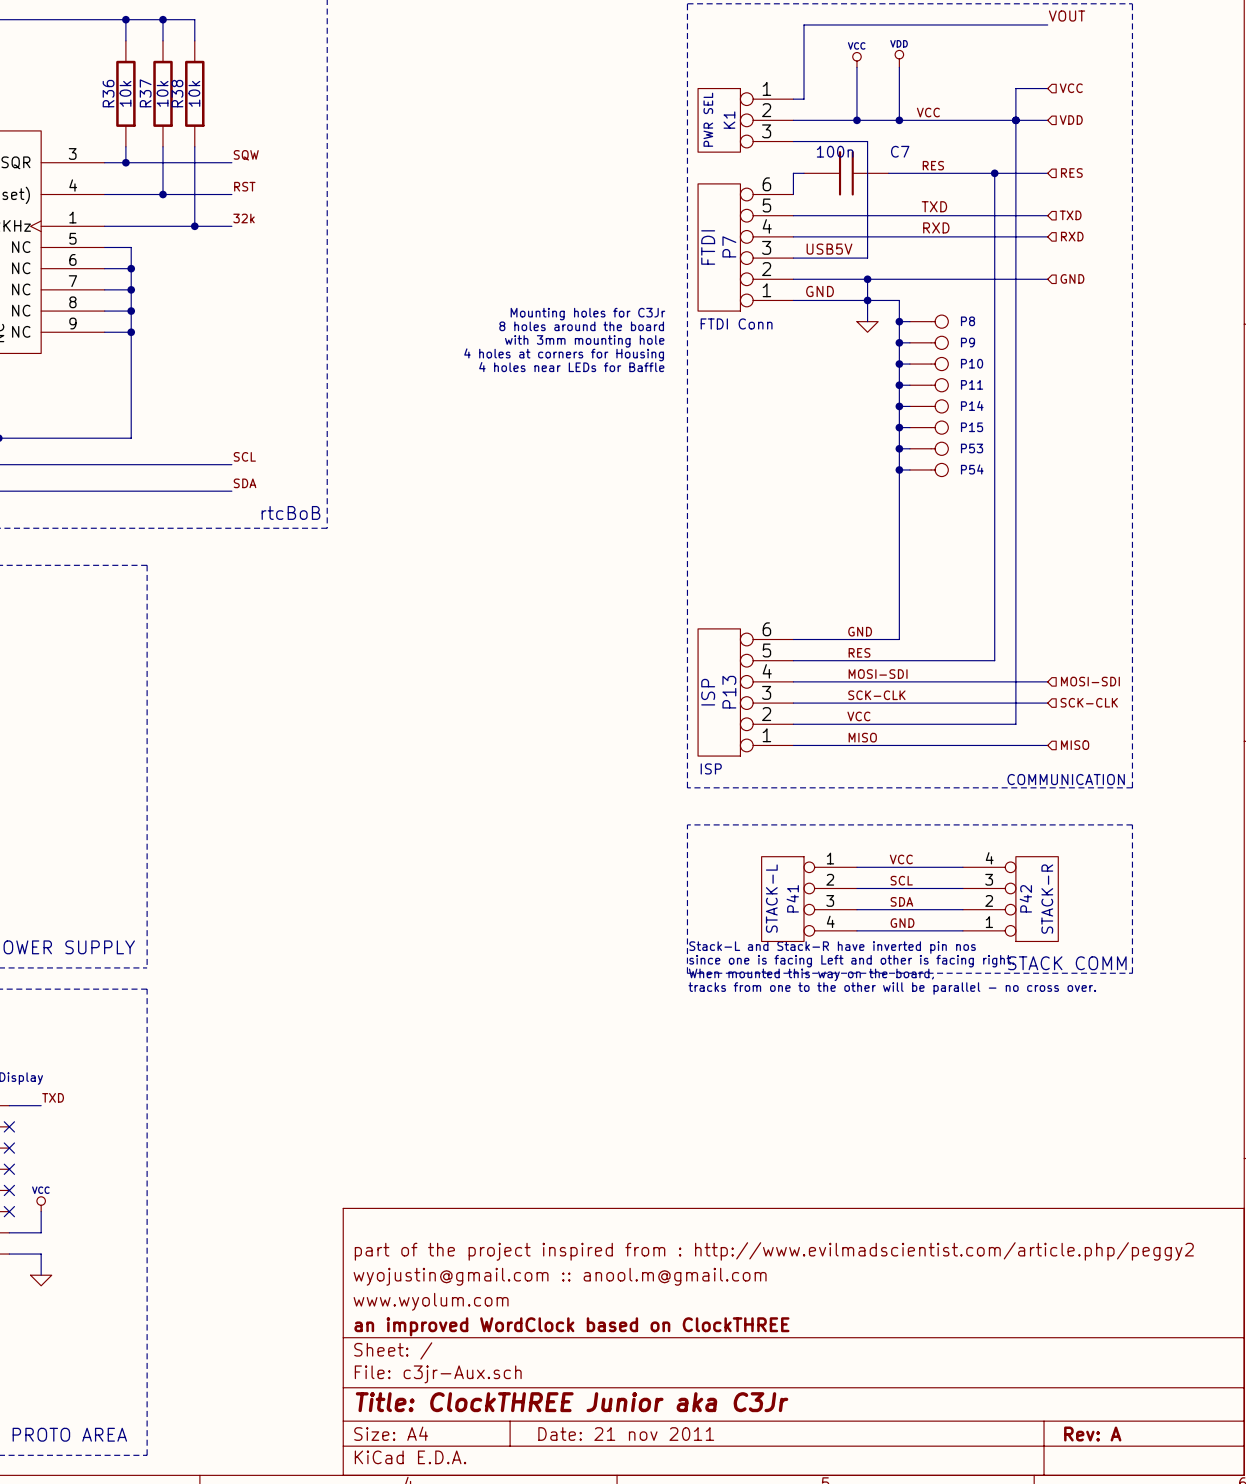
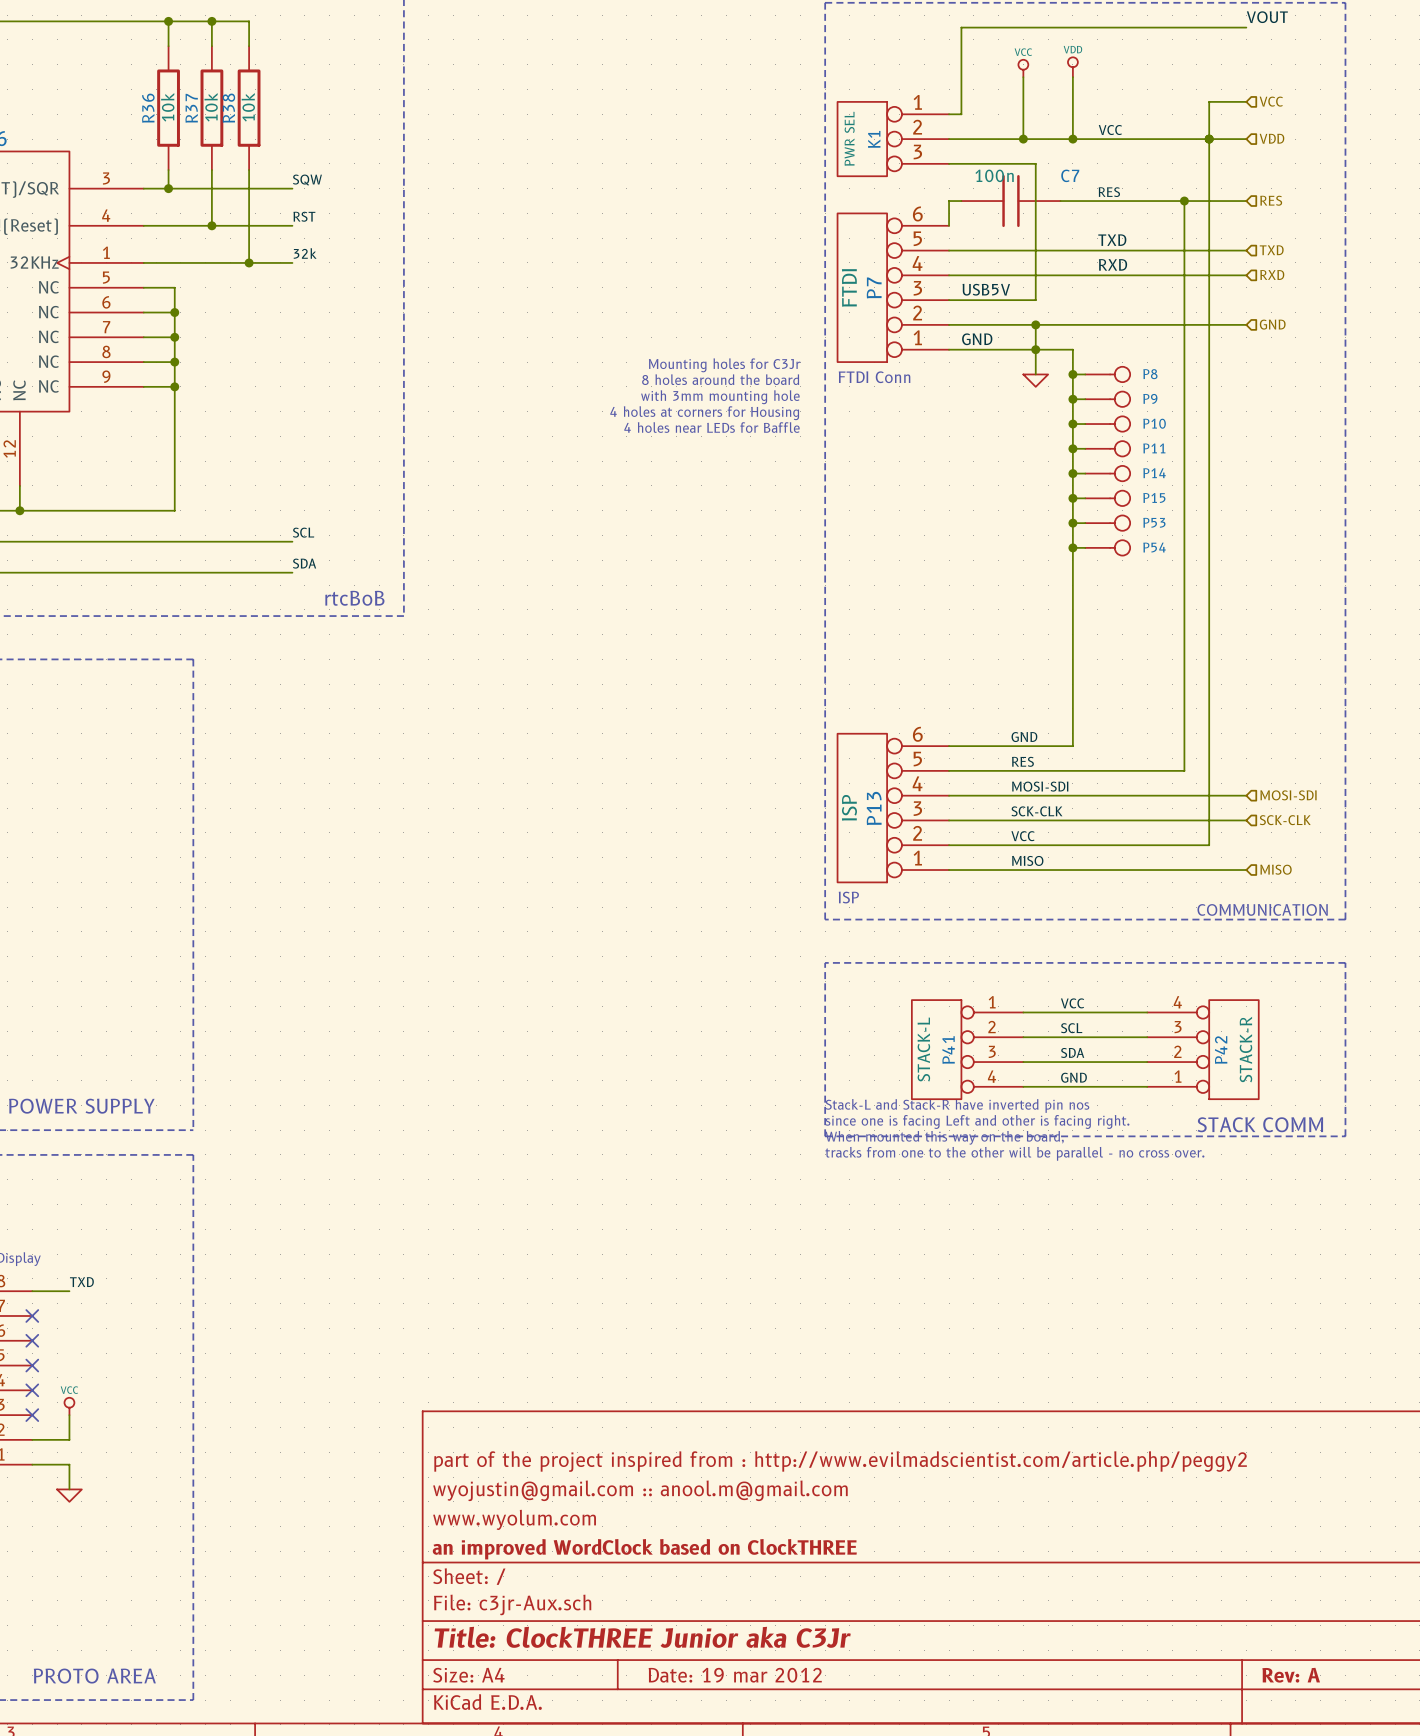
title block: Date: 21 nov 2011 (626, 1434) -> Date: 19 mar 2012 (735, 1675)

